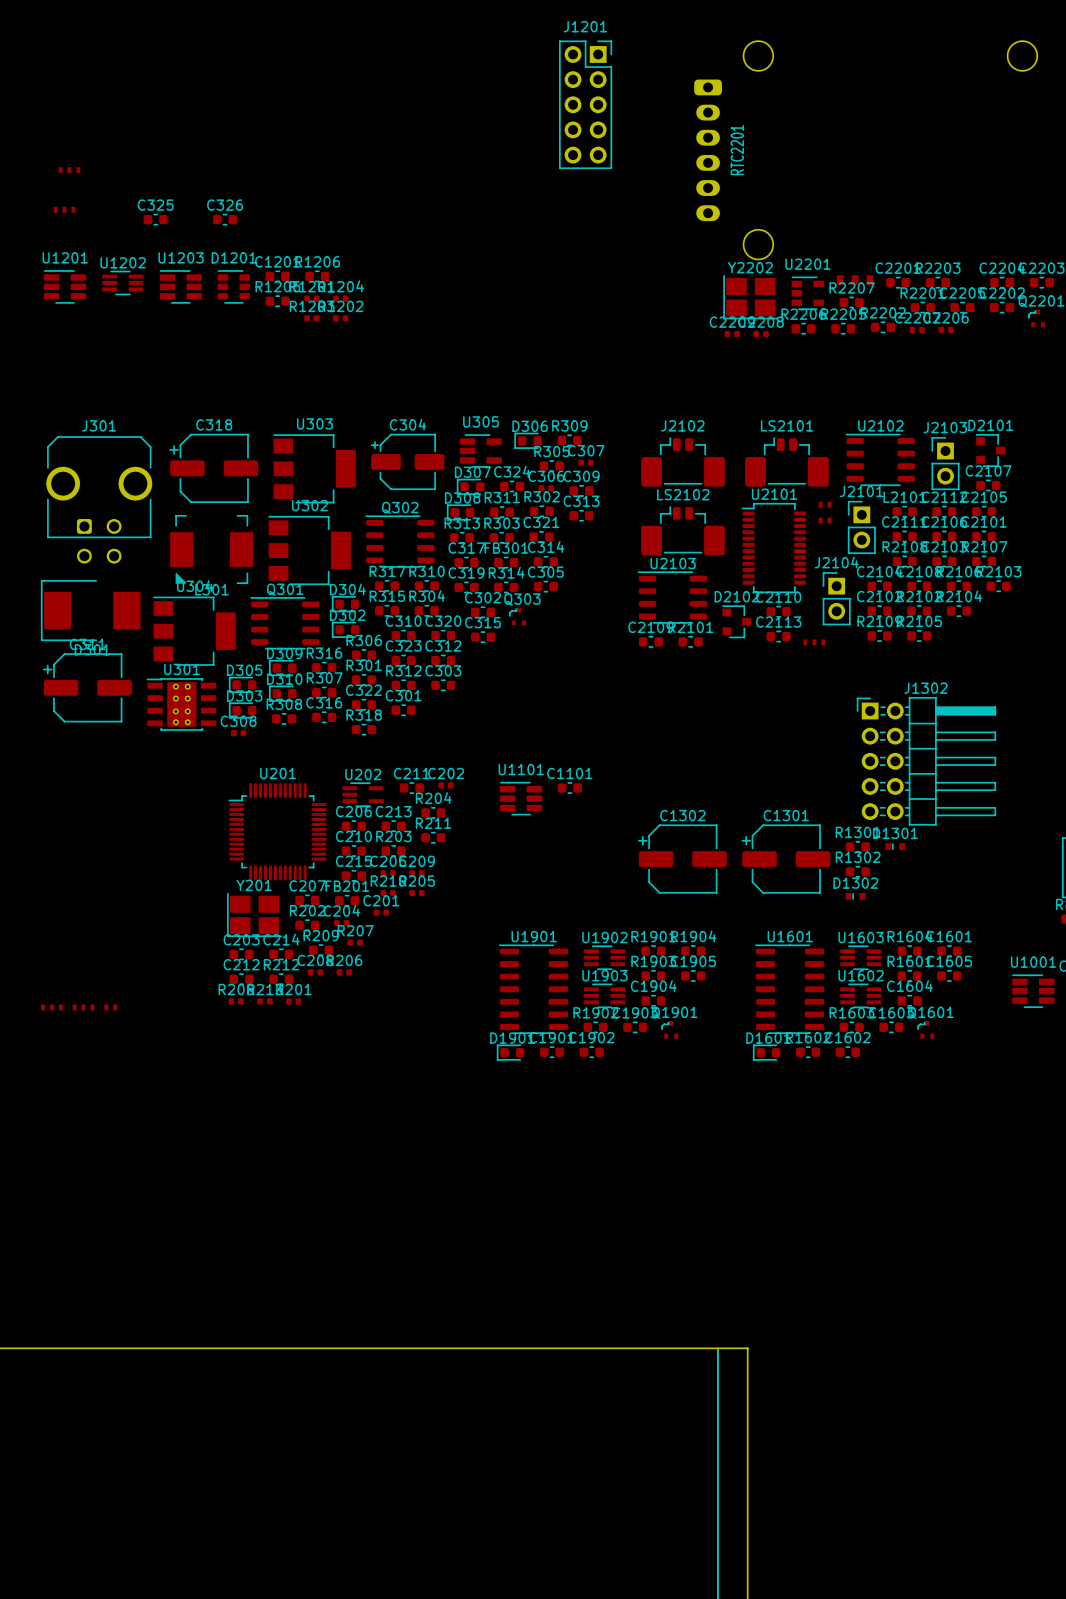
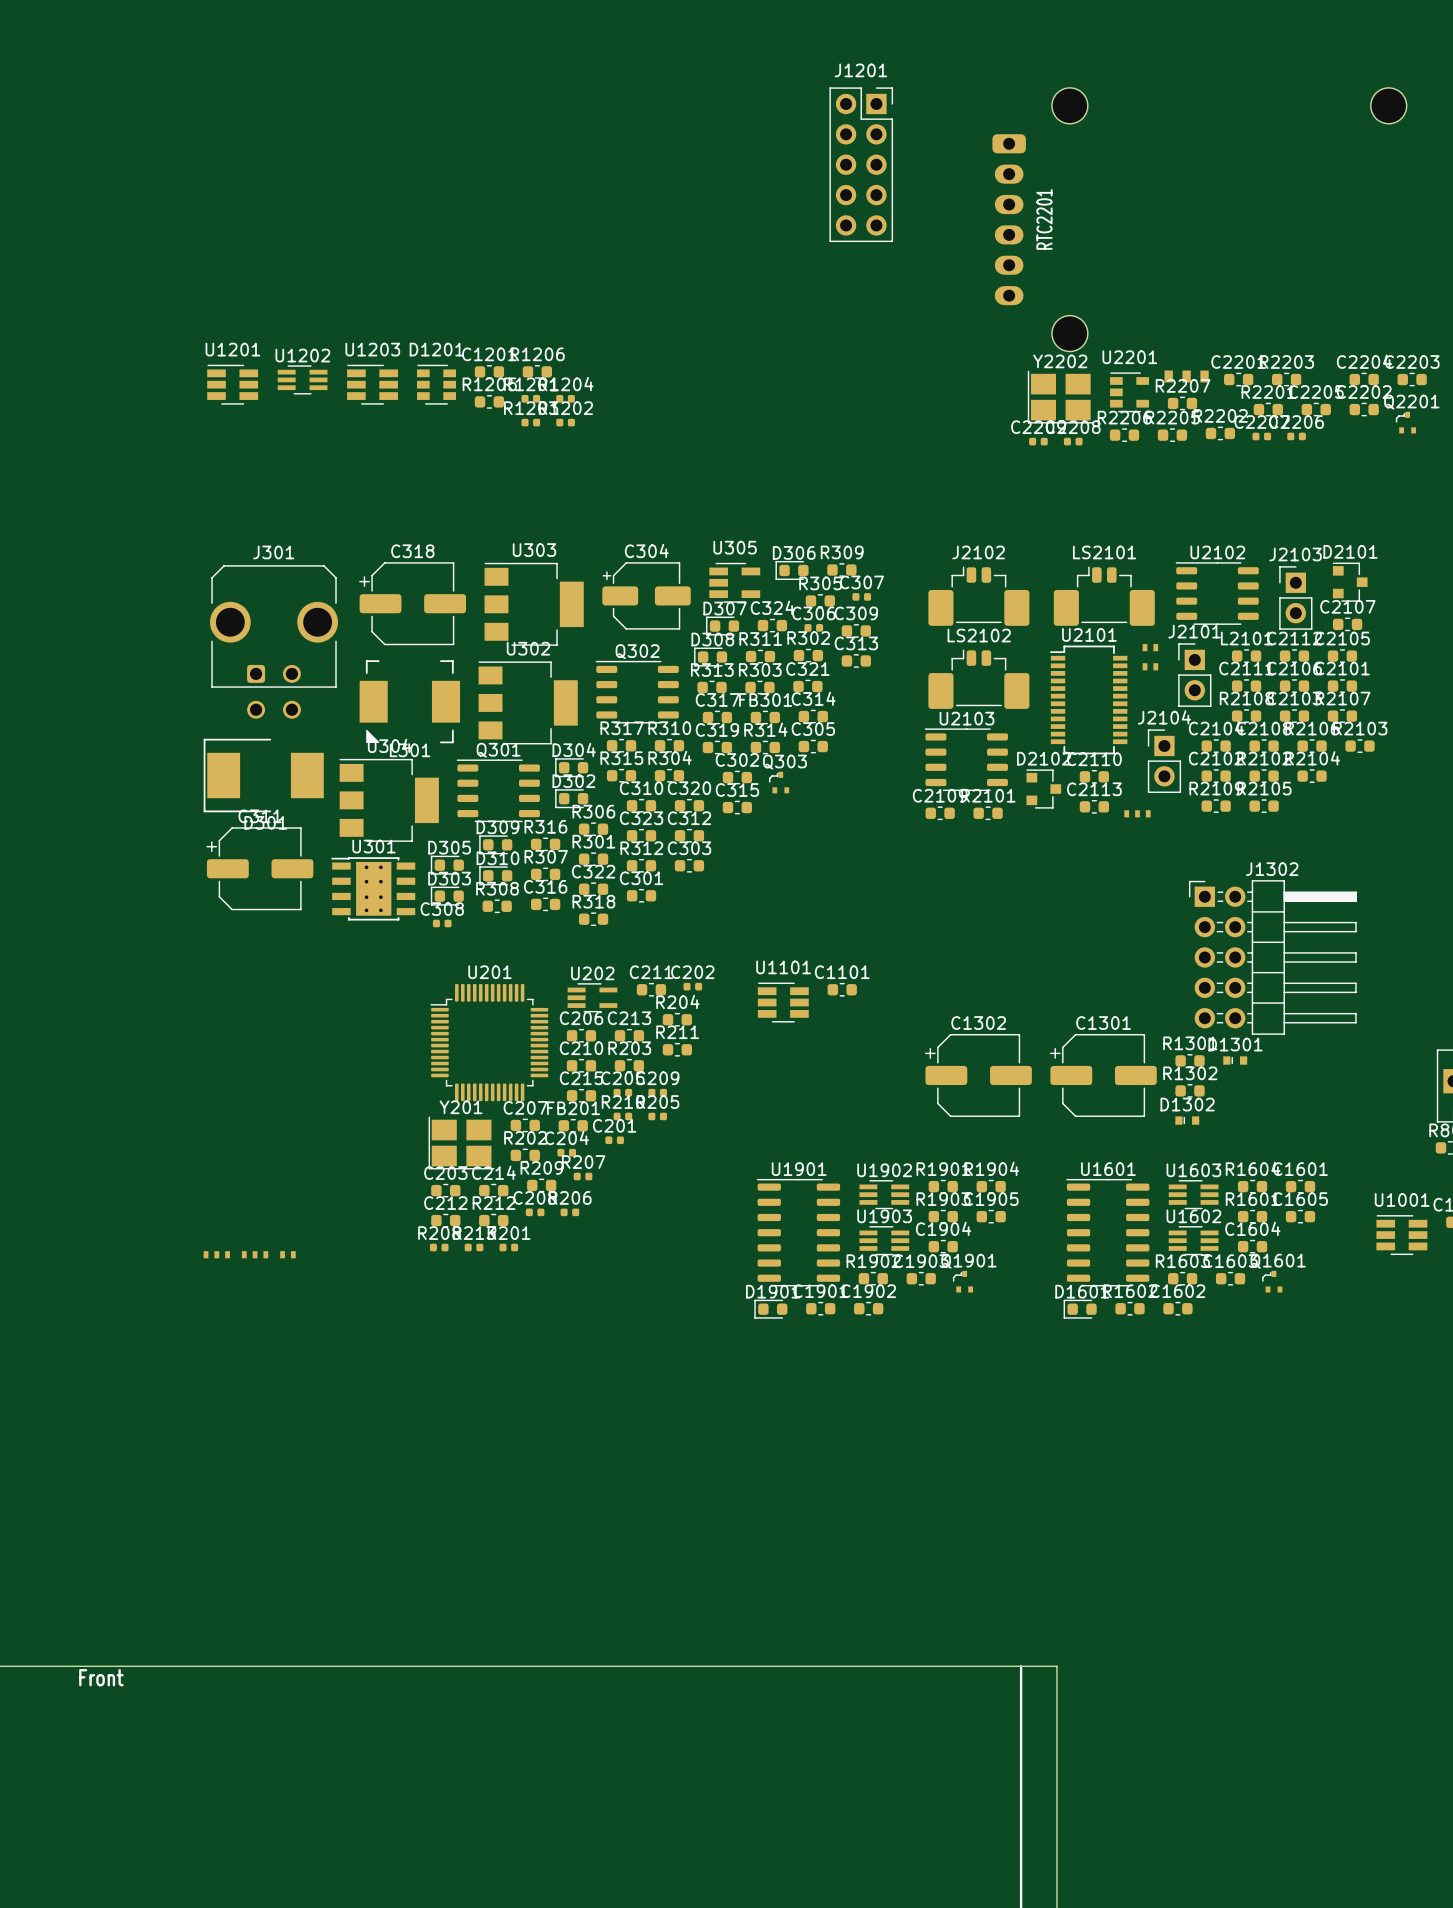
part: (69, 170) -> none
part: (64, 209) -> none
C325: (155, 219) -> none
C326: (225, 219) -> none

